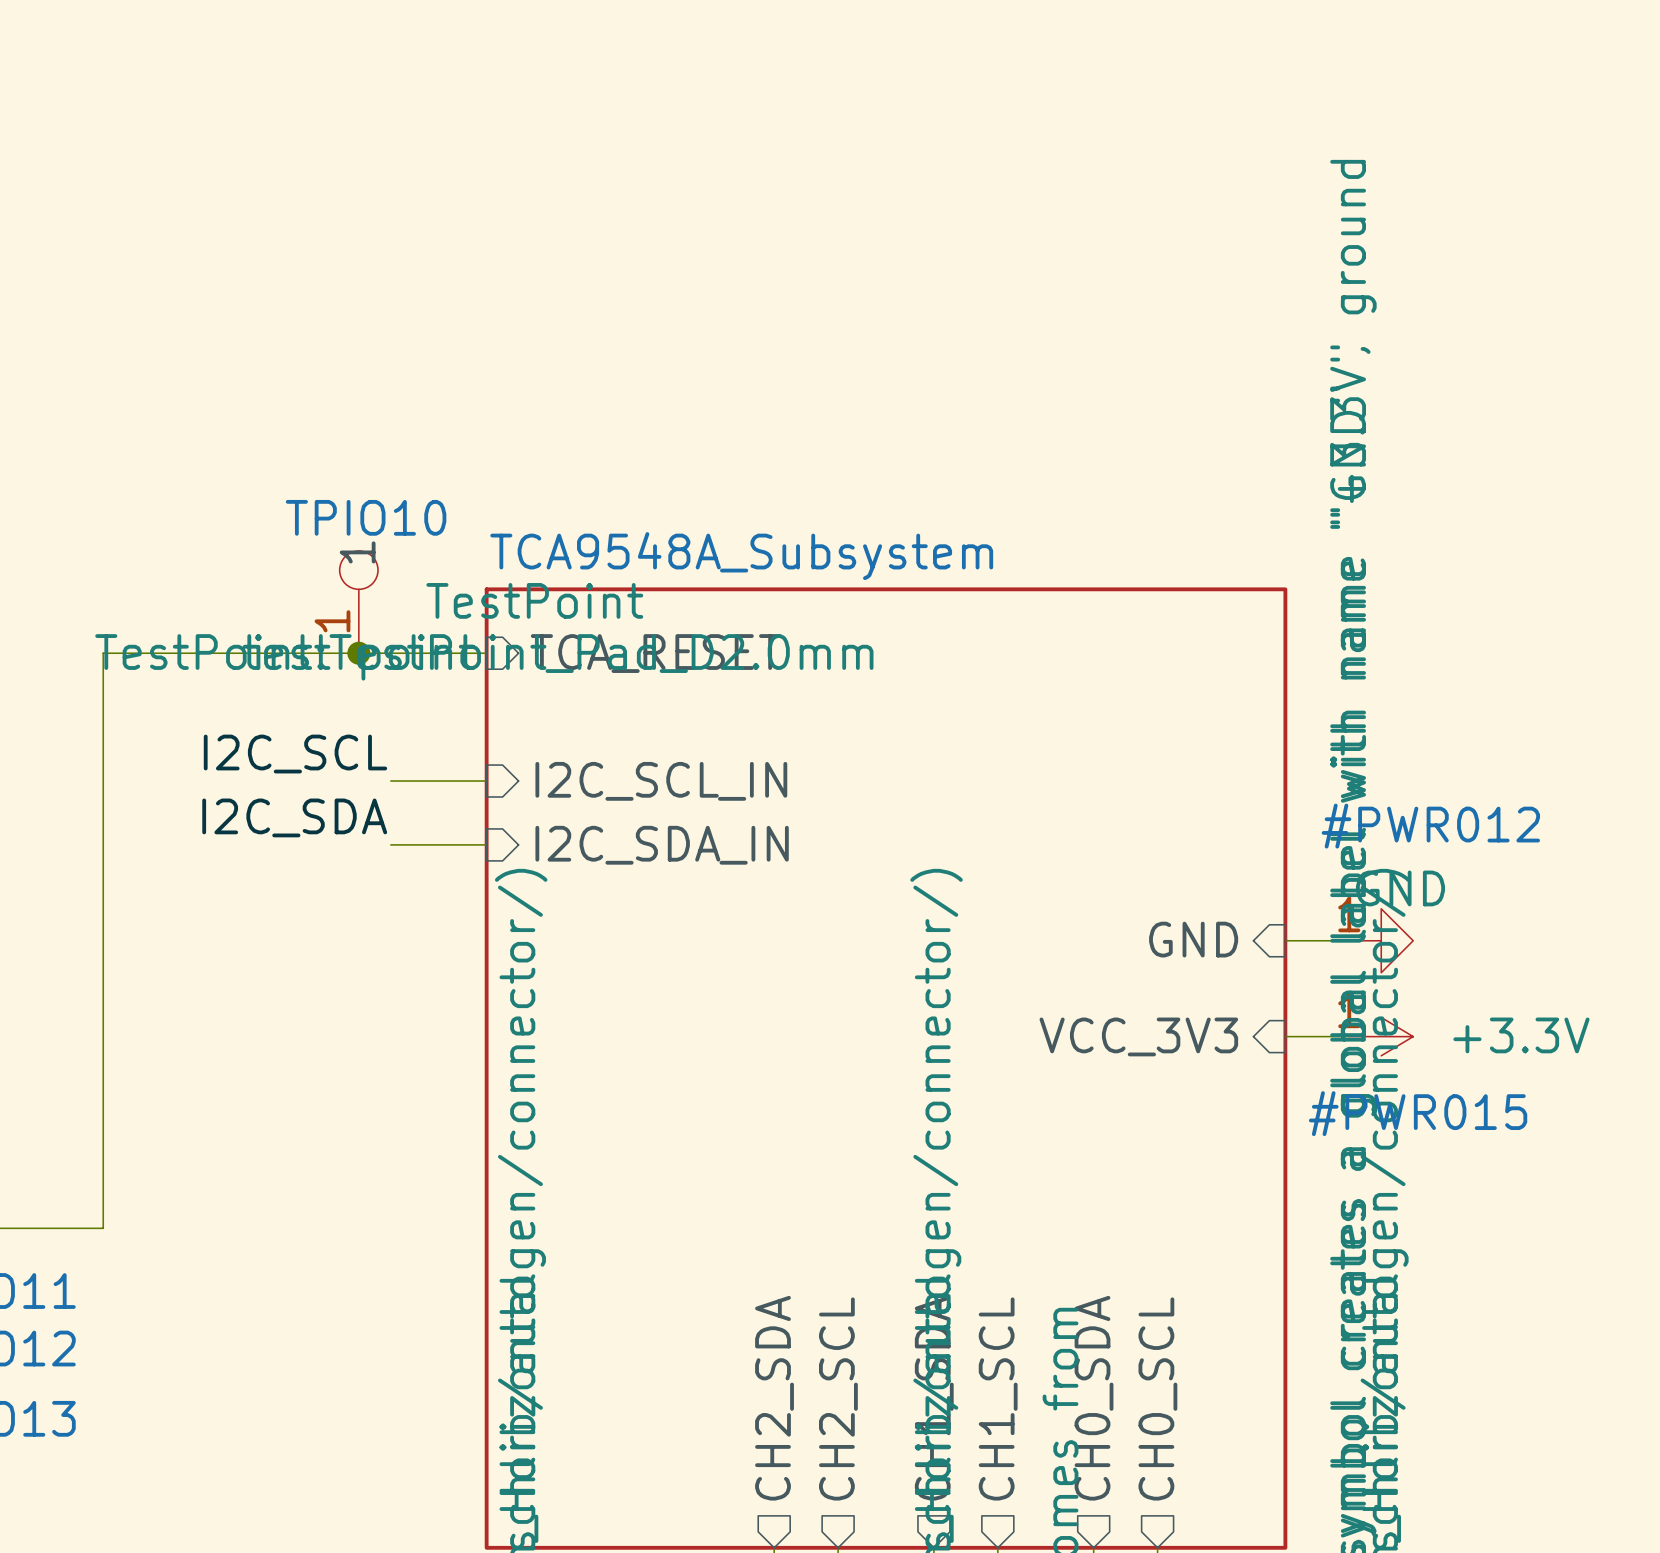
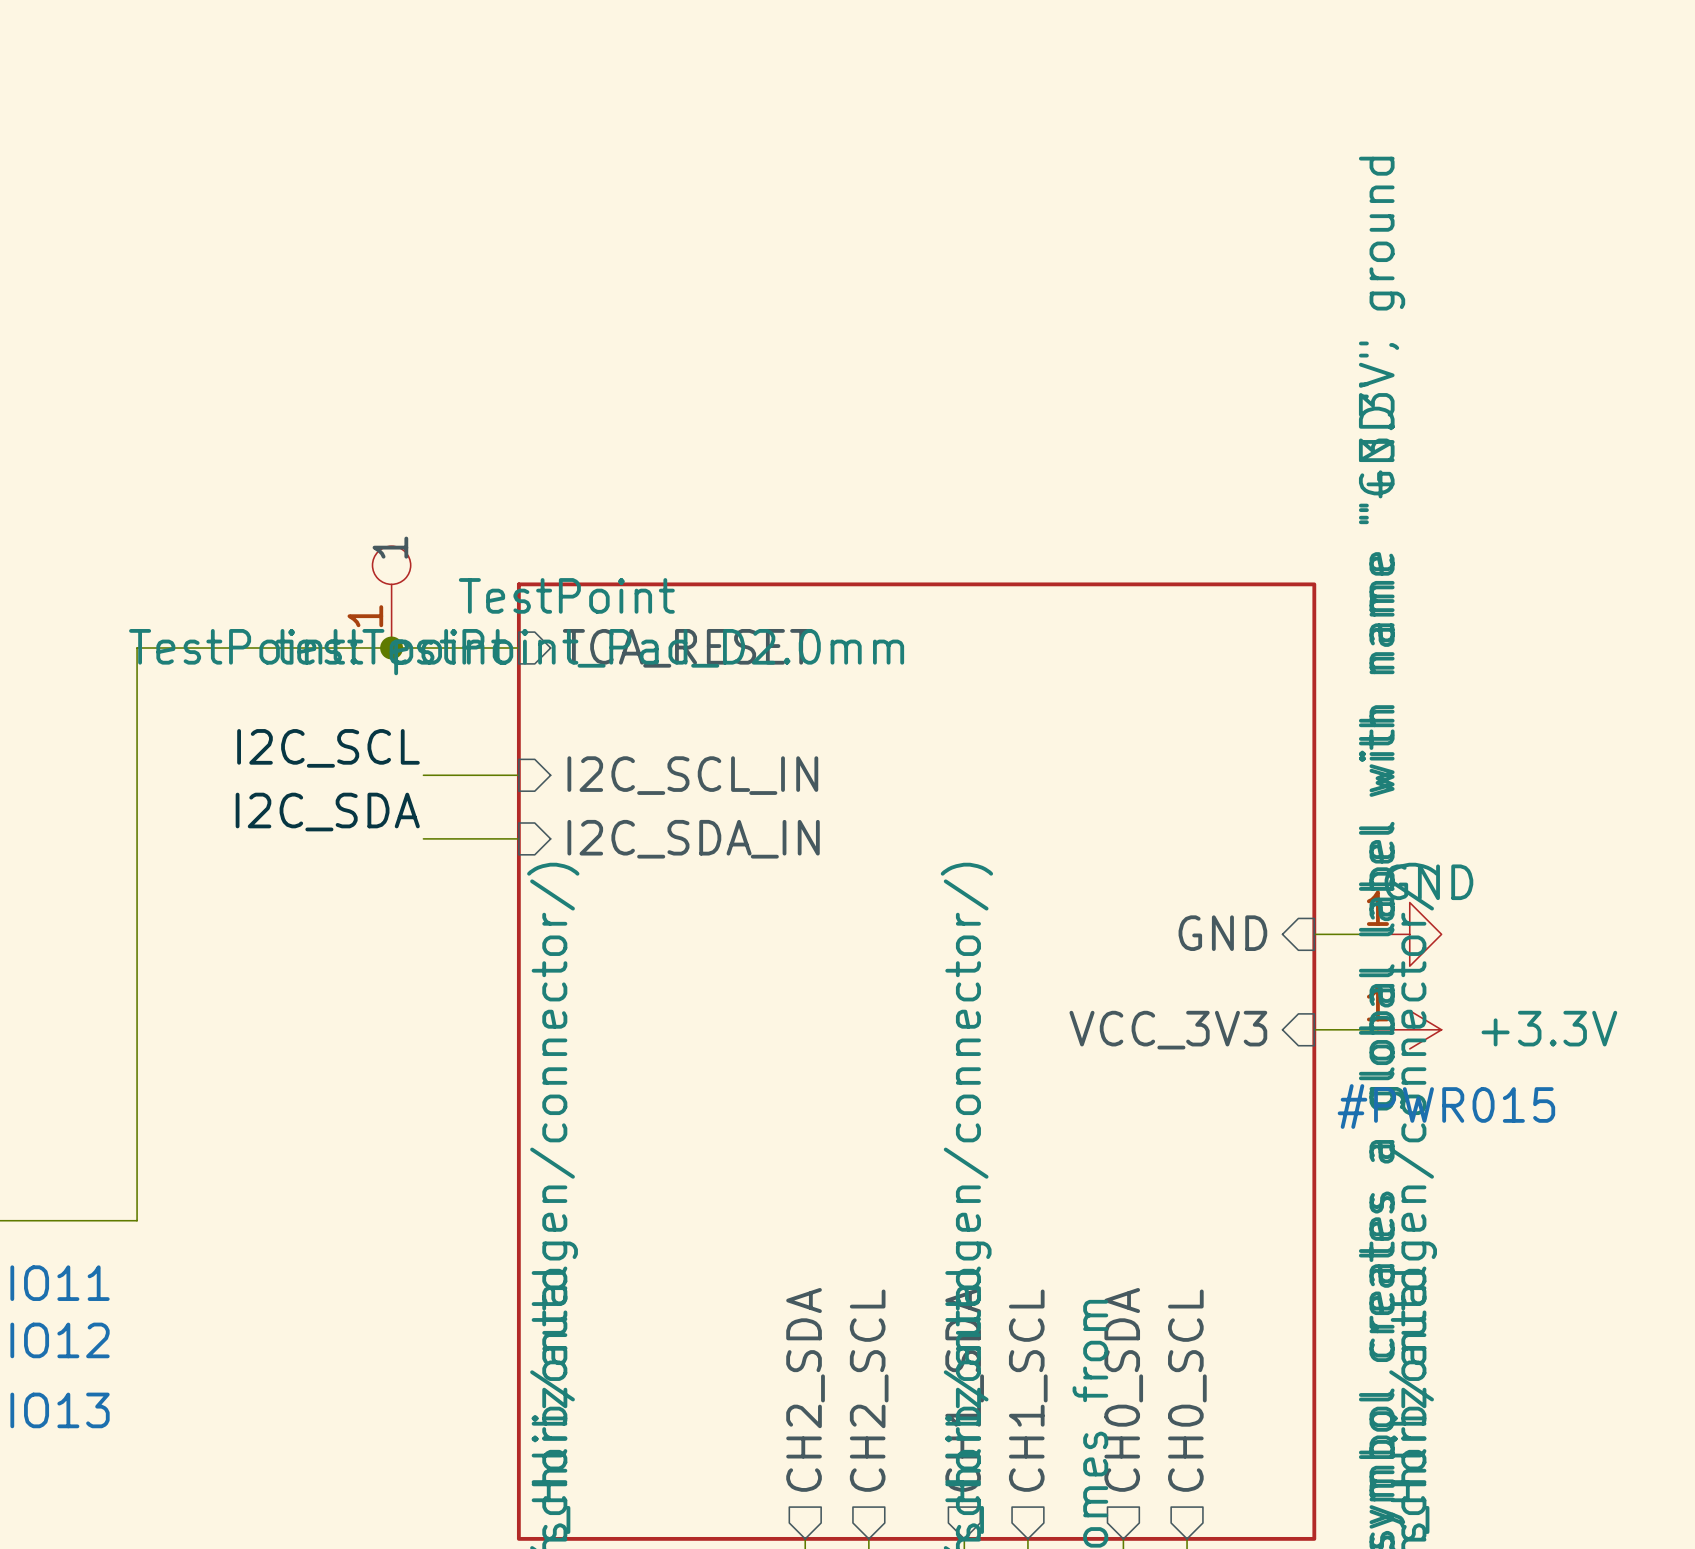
TPIO10 name: TPIO10 (366, 517) -> none
sheet TCA9548A_Subsystem name: TCA9548A_Subsystem (741, 556) -> none
#PWR012 name: #PWR012 (1430, 826) -> none

